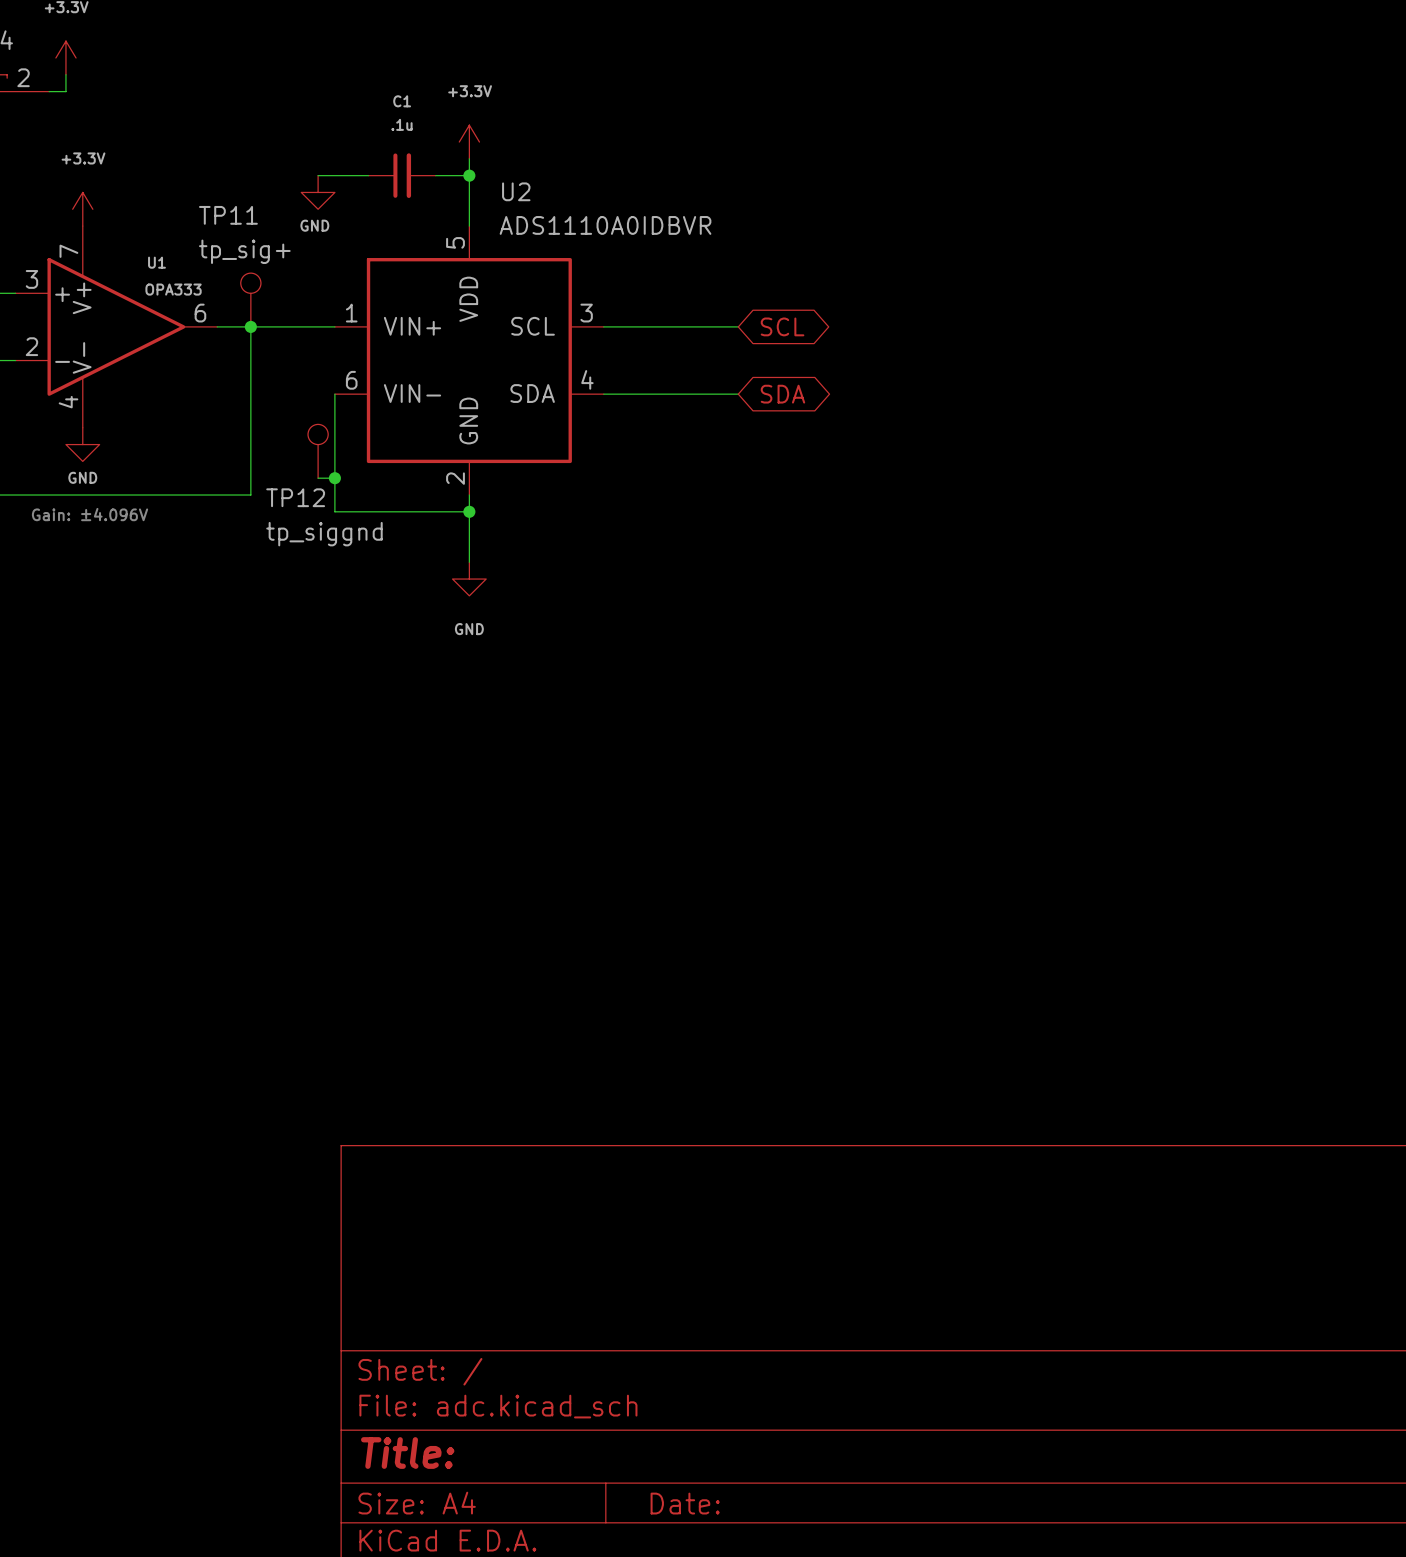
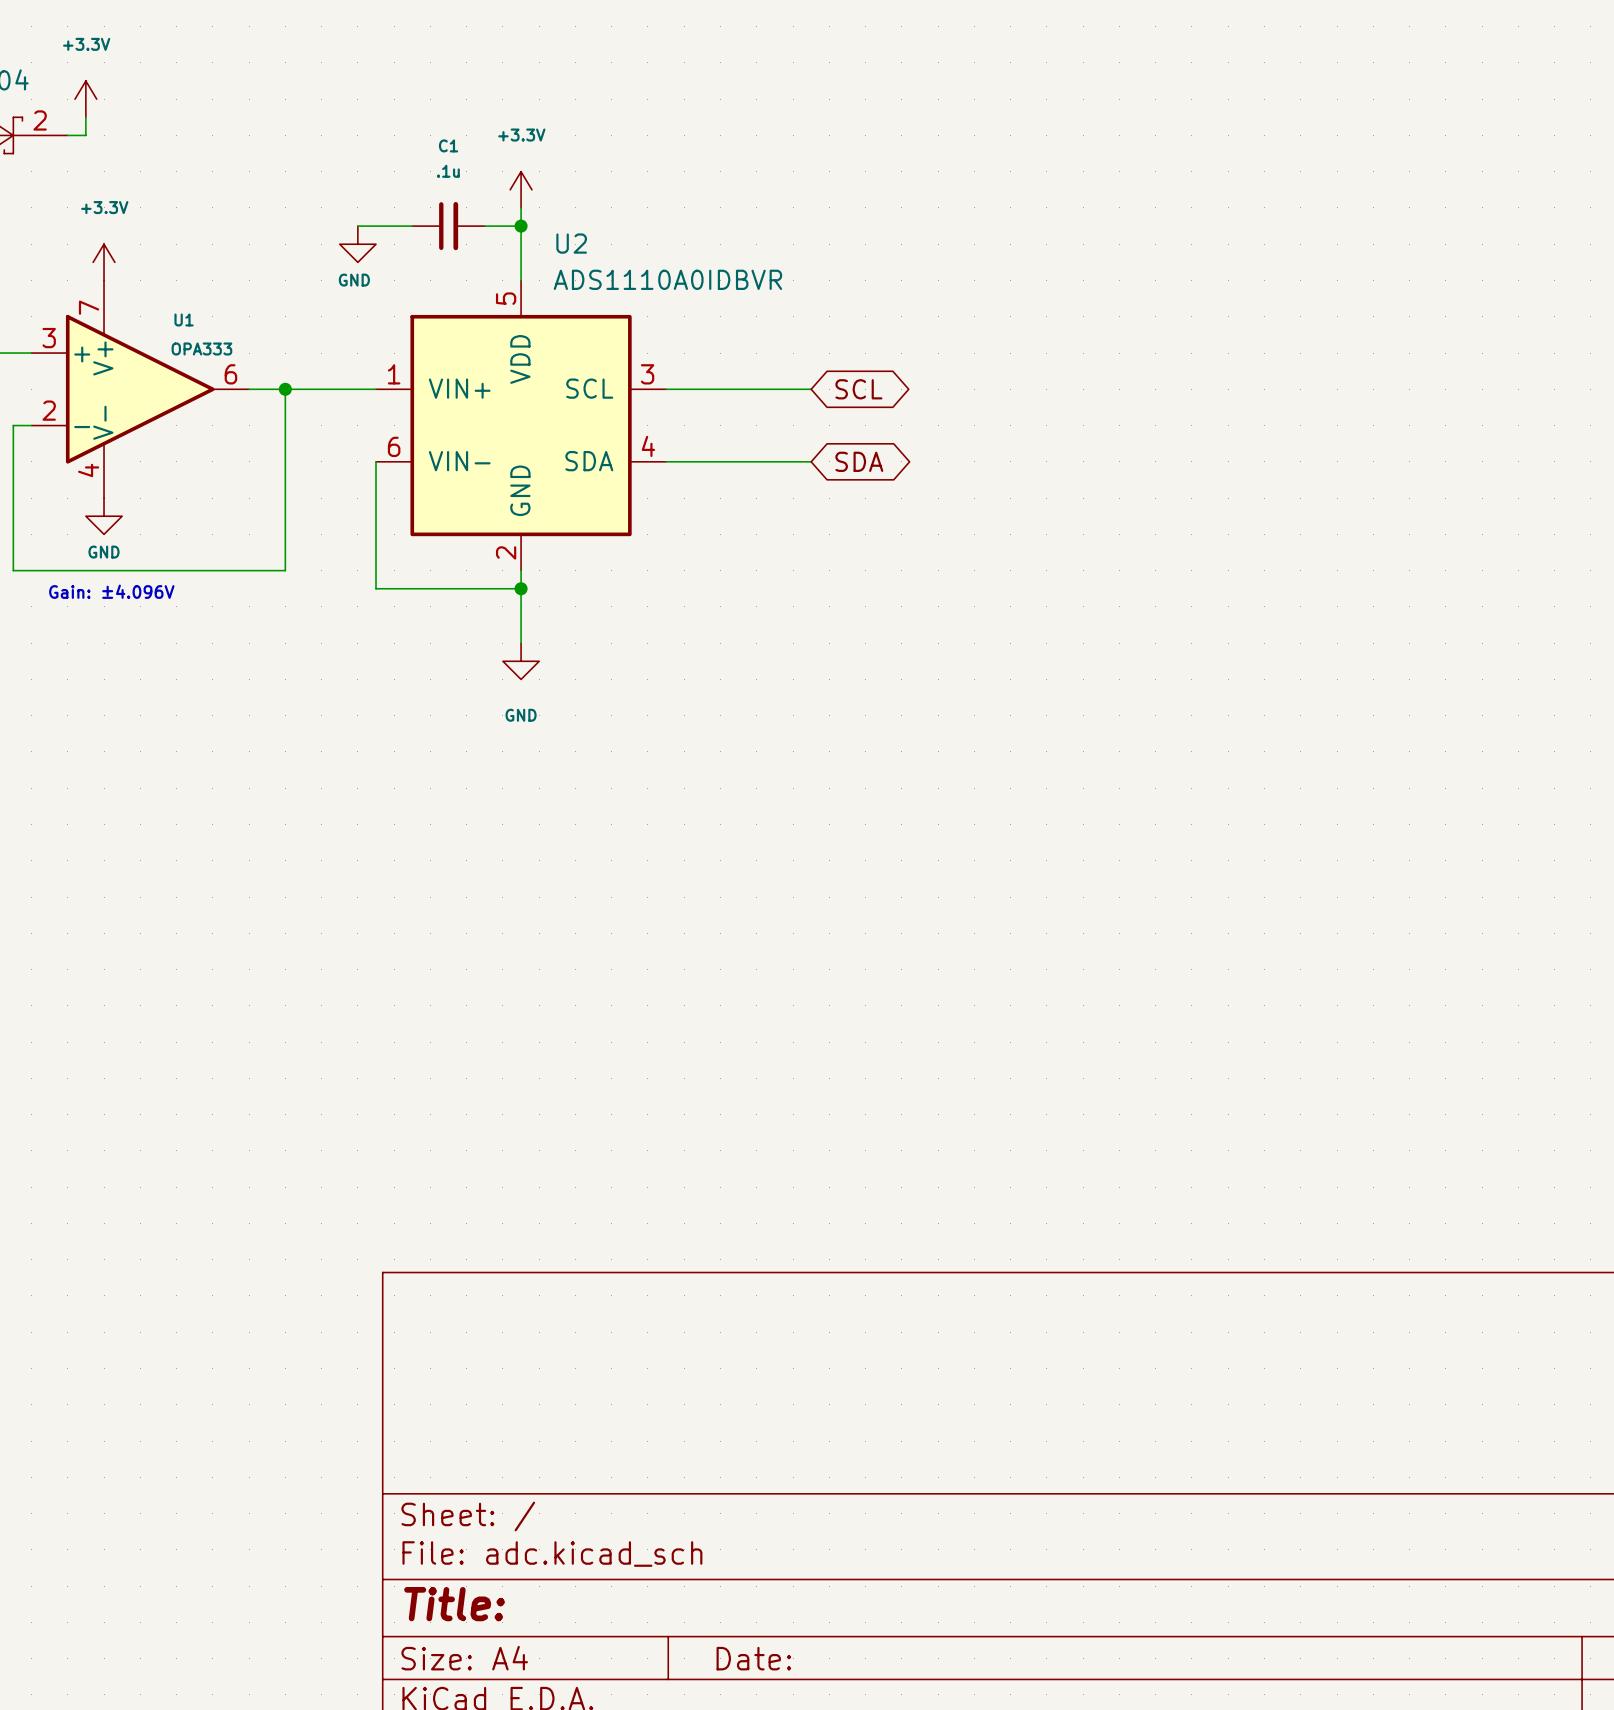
TP11: tp_sig+ (250, 300) -> none
TP12: tp_siggnd (318, 451) -> none
wire: (318, 478) (334, 478) -> none
junction: (334, 478) -> none

